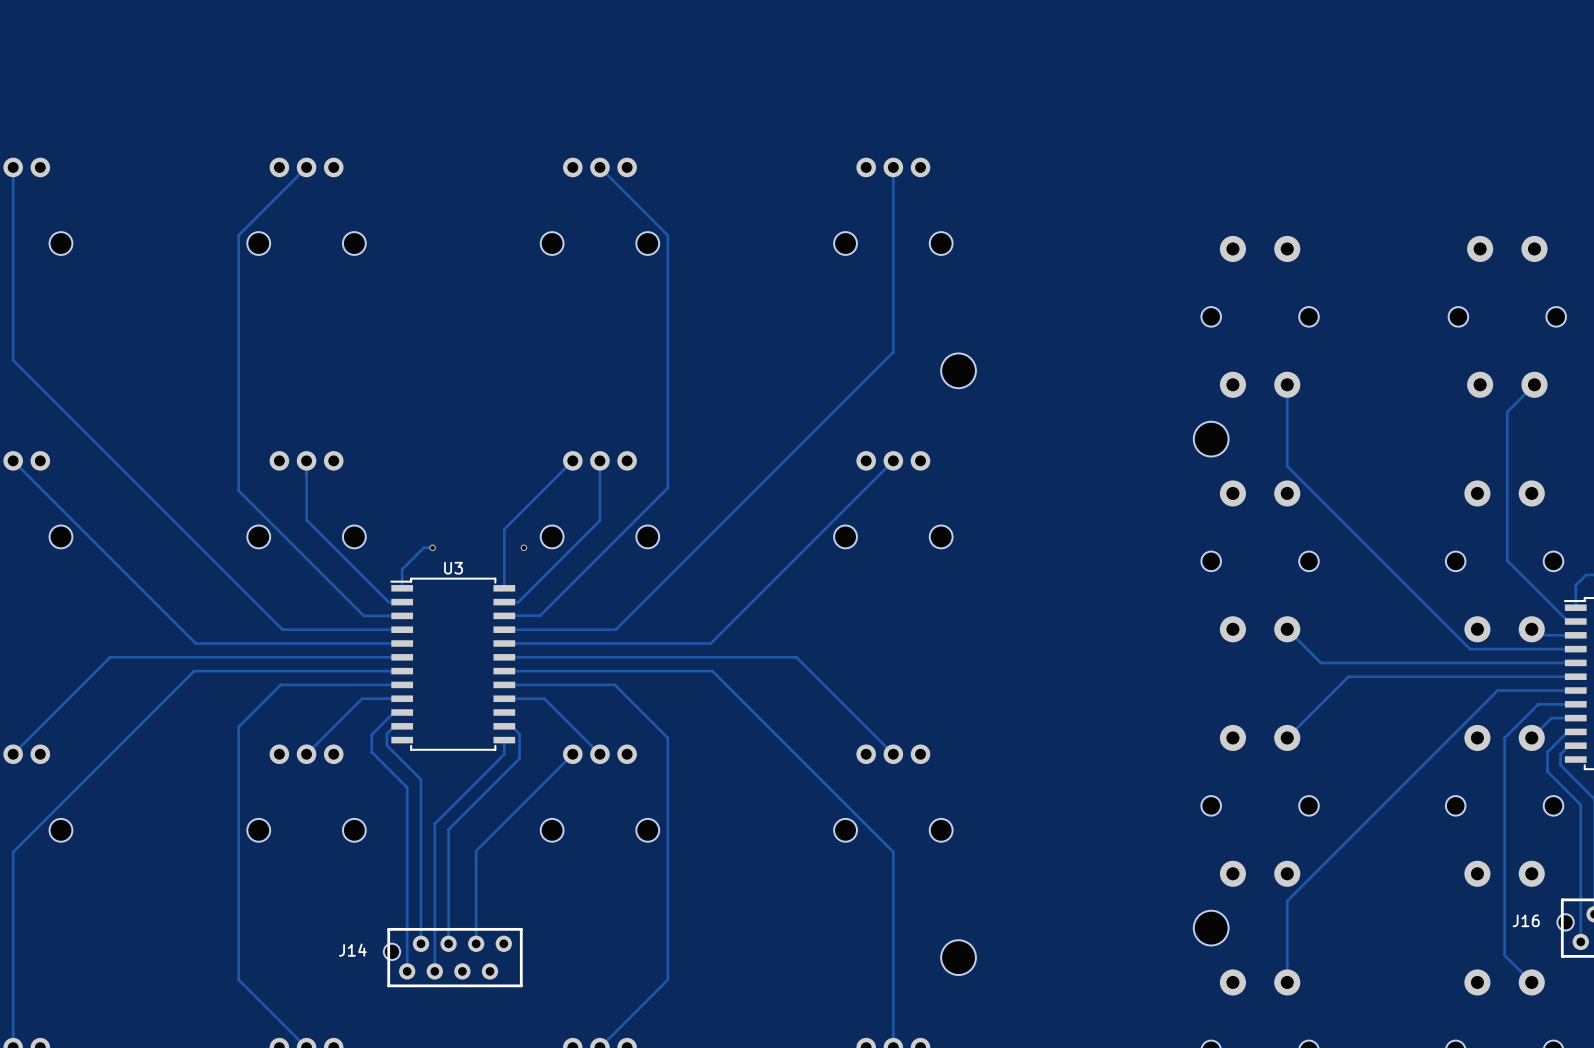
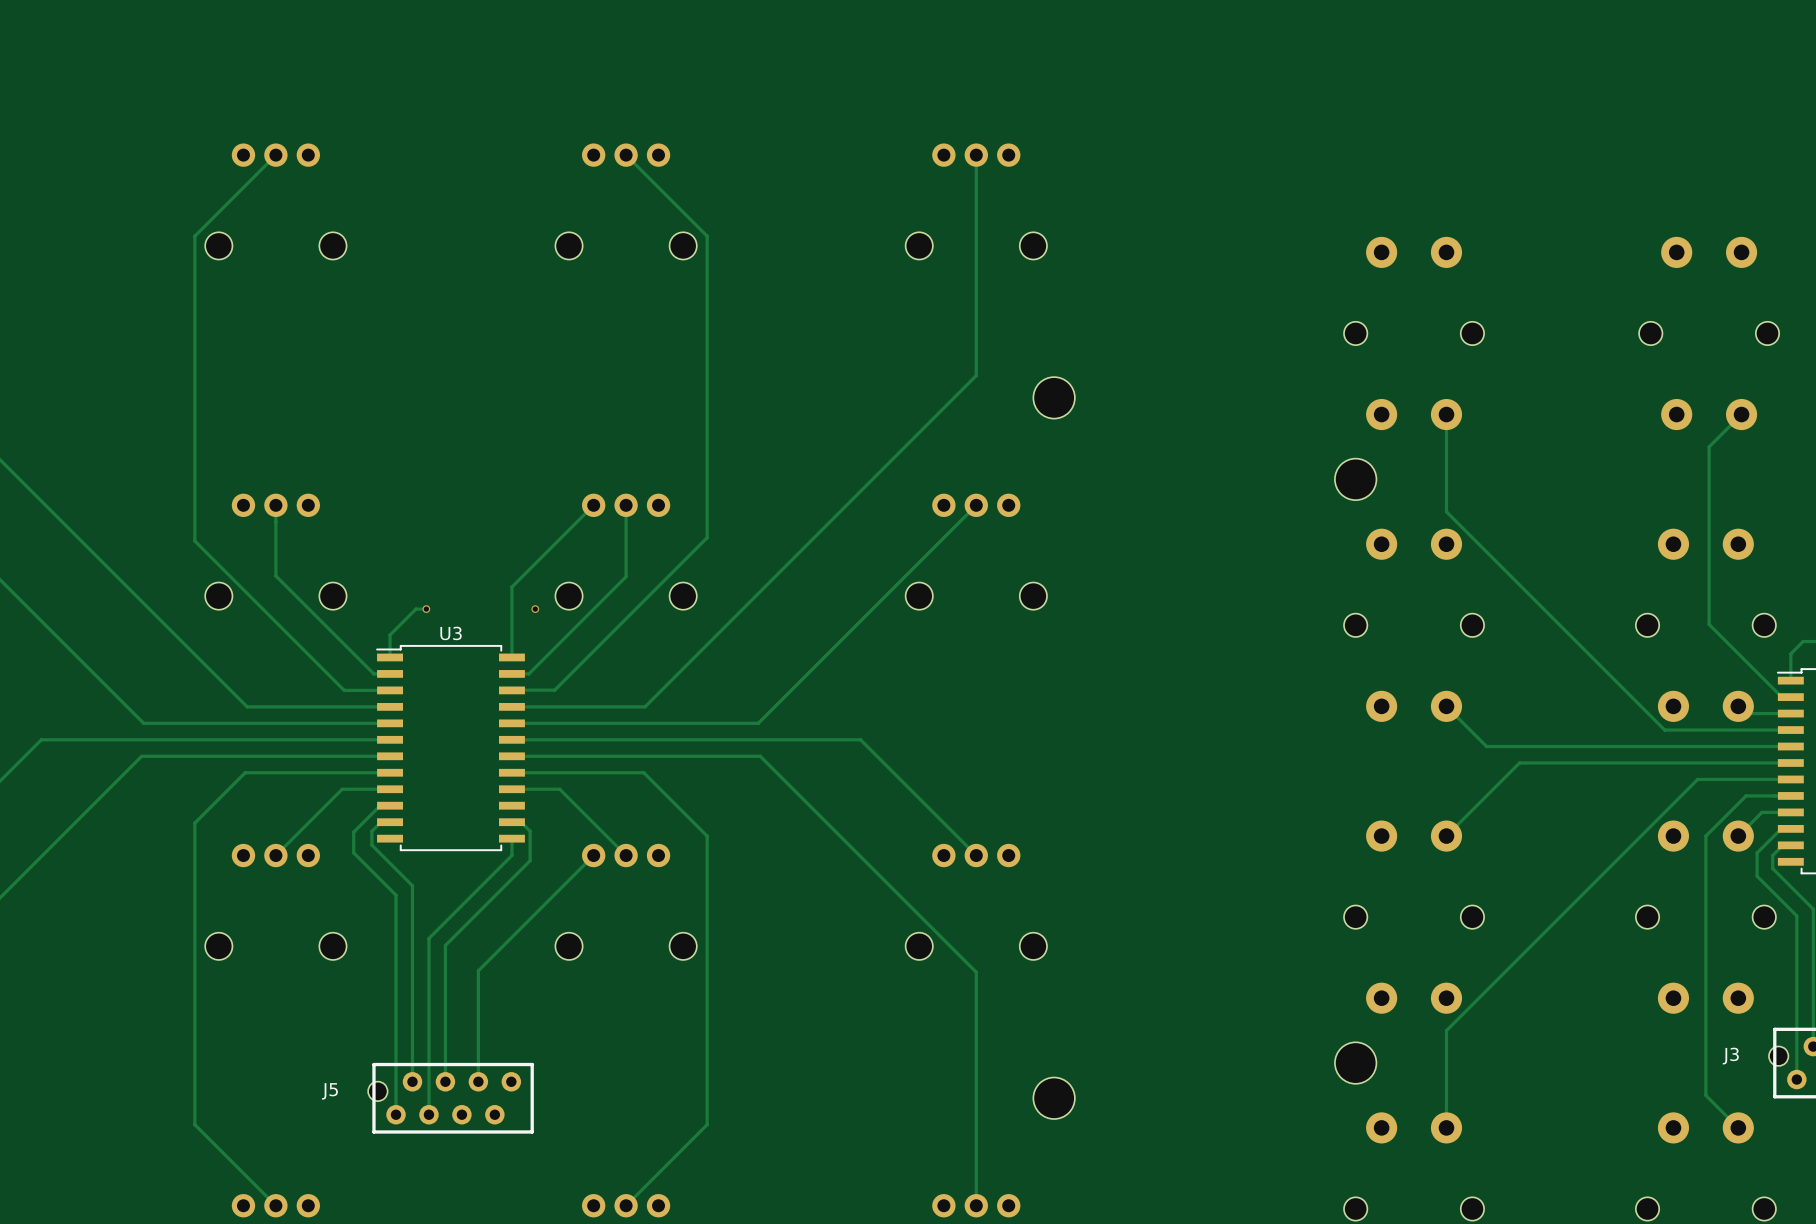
J16 name: J16 (1526, 920) -> J3 (1730, 1056)
J14 name: J14 (352, 950) -> J5 (329, 1091)

